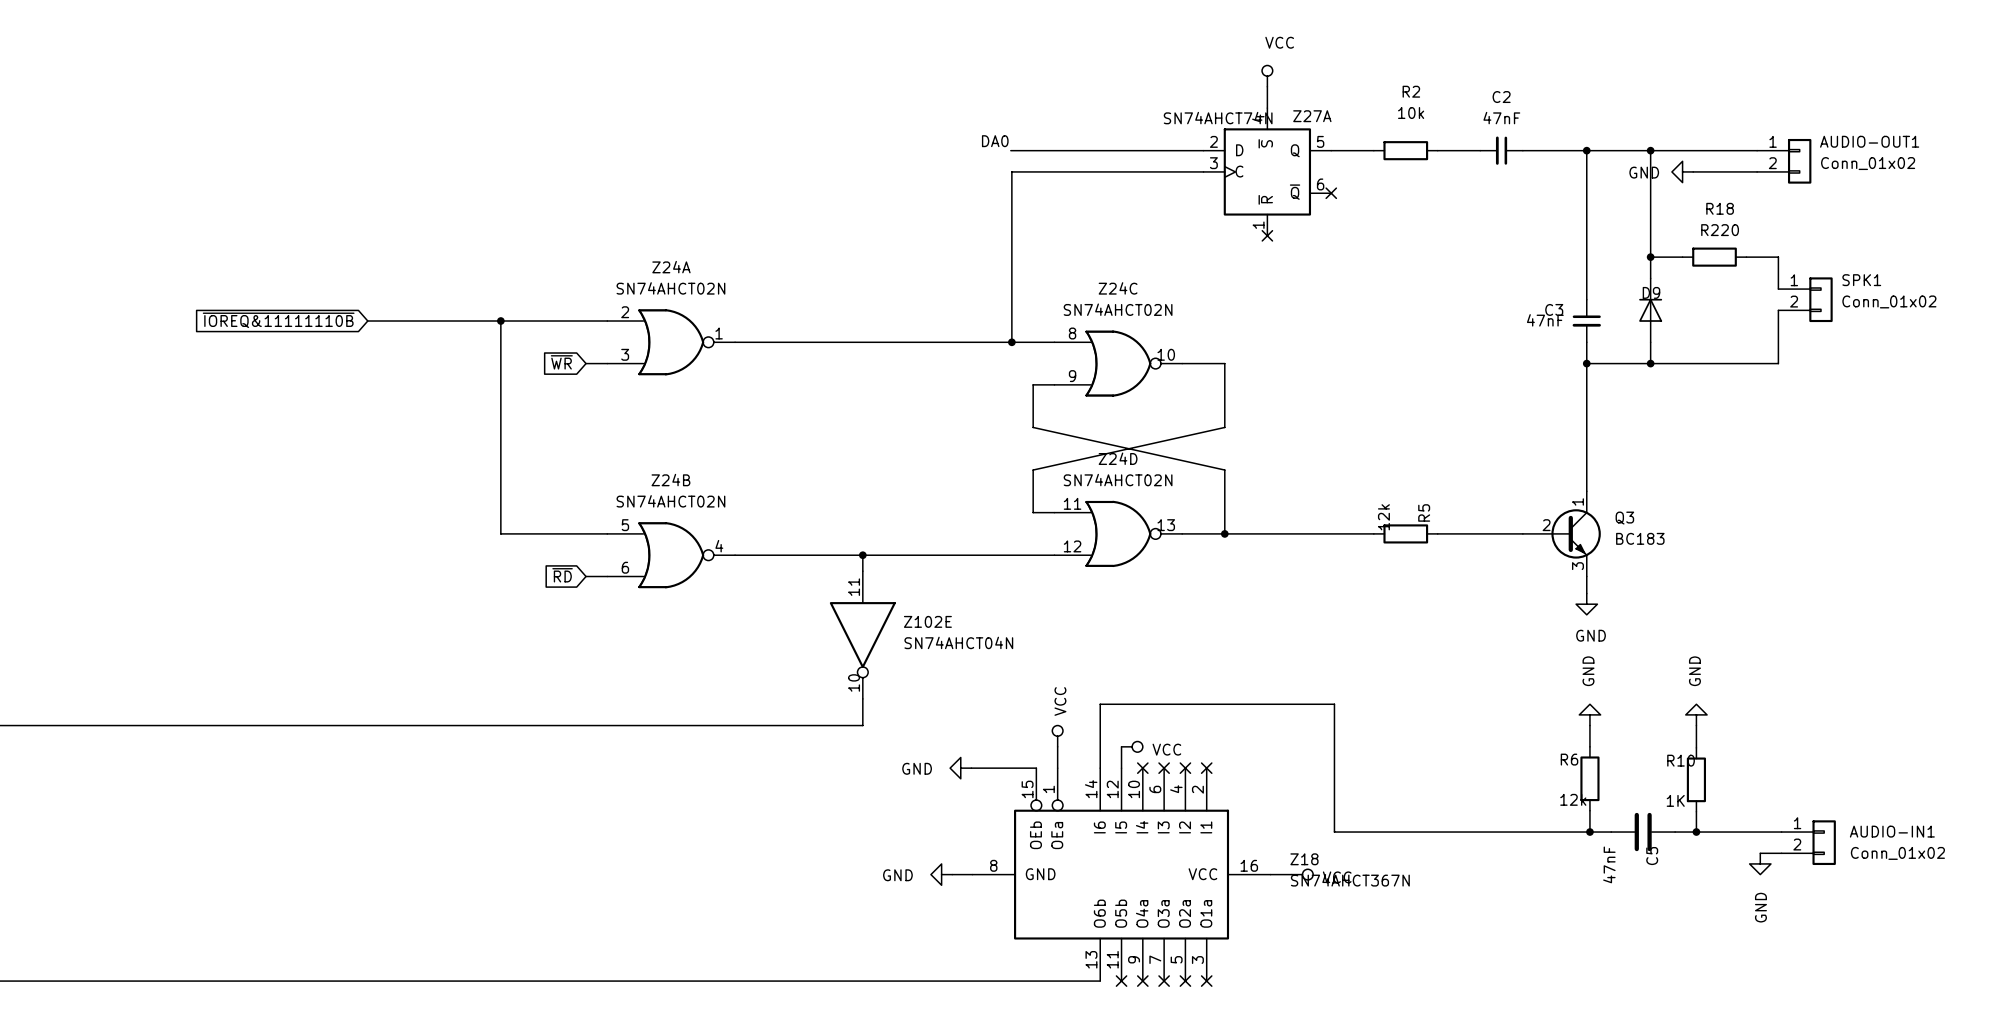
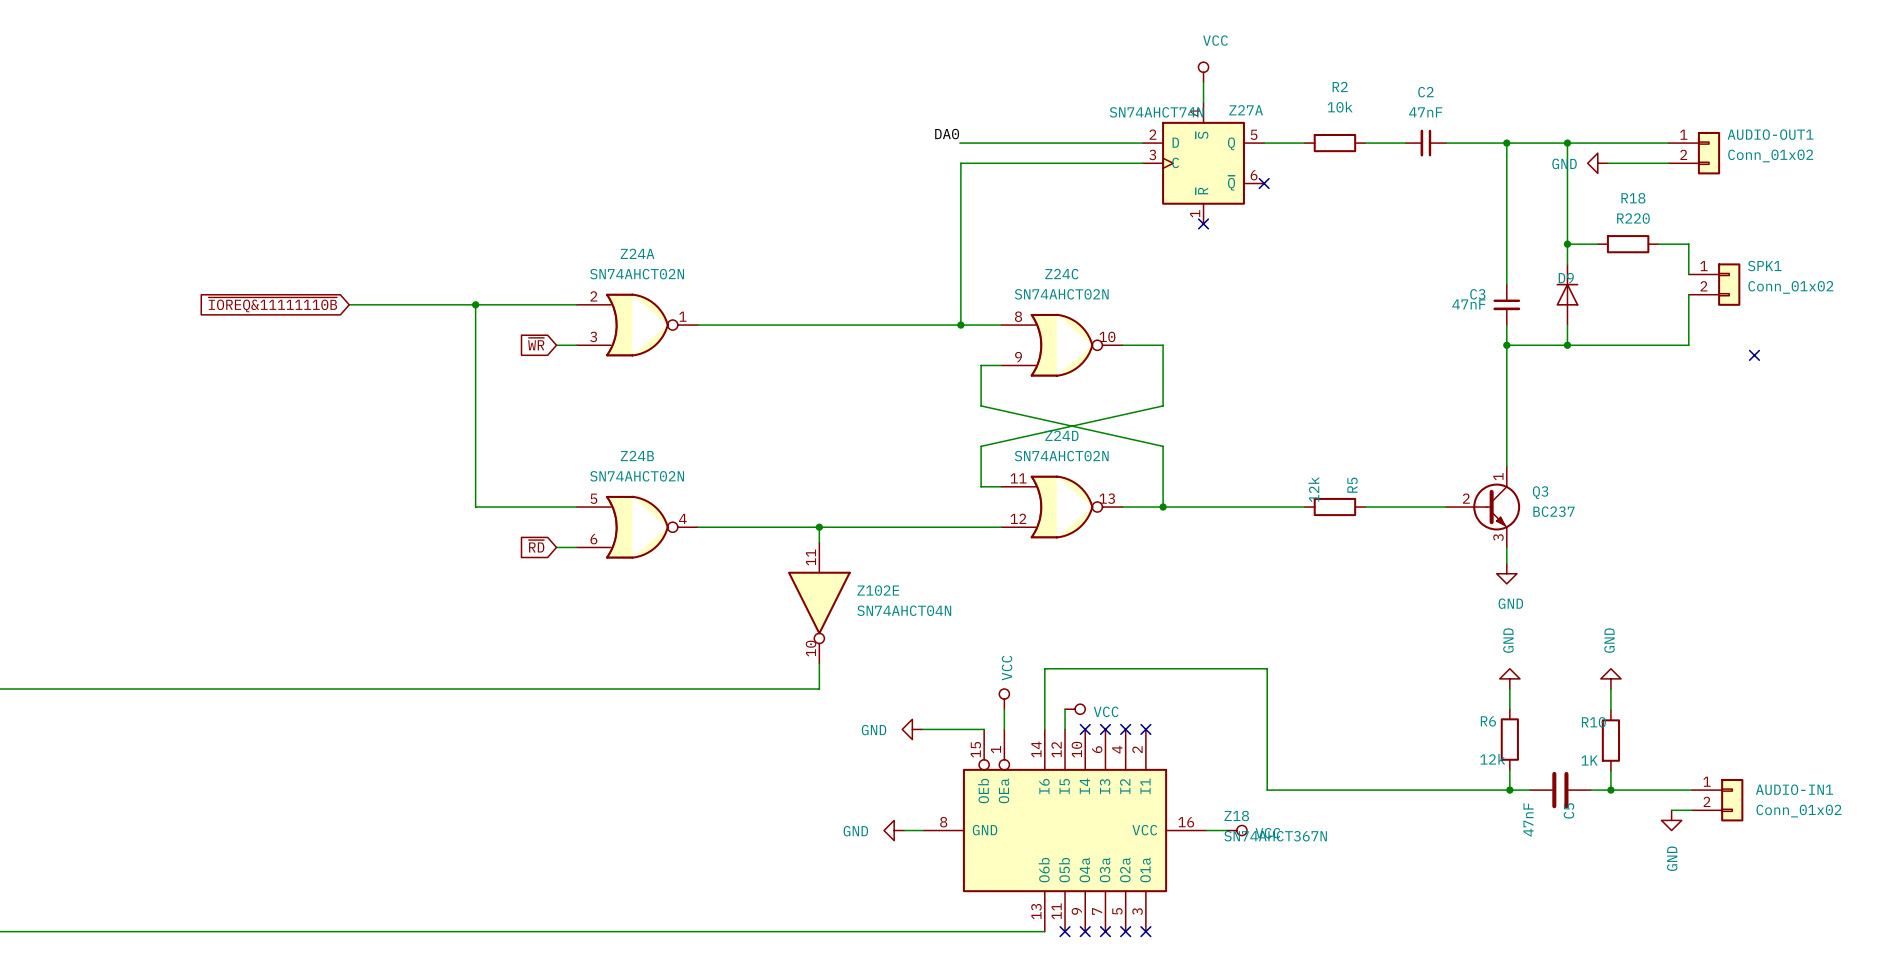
no-connect mark: none -> (1754, 355)
Q3 symbol: [1522, 491, 1601, 577] -> [1446, 466, 1521, 548]
Q3 value: BC183 (1640, 538) -> BC237 (1553, 511)

